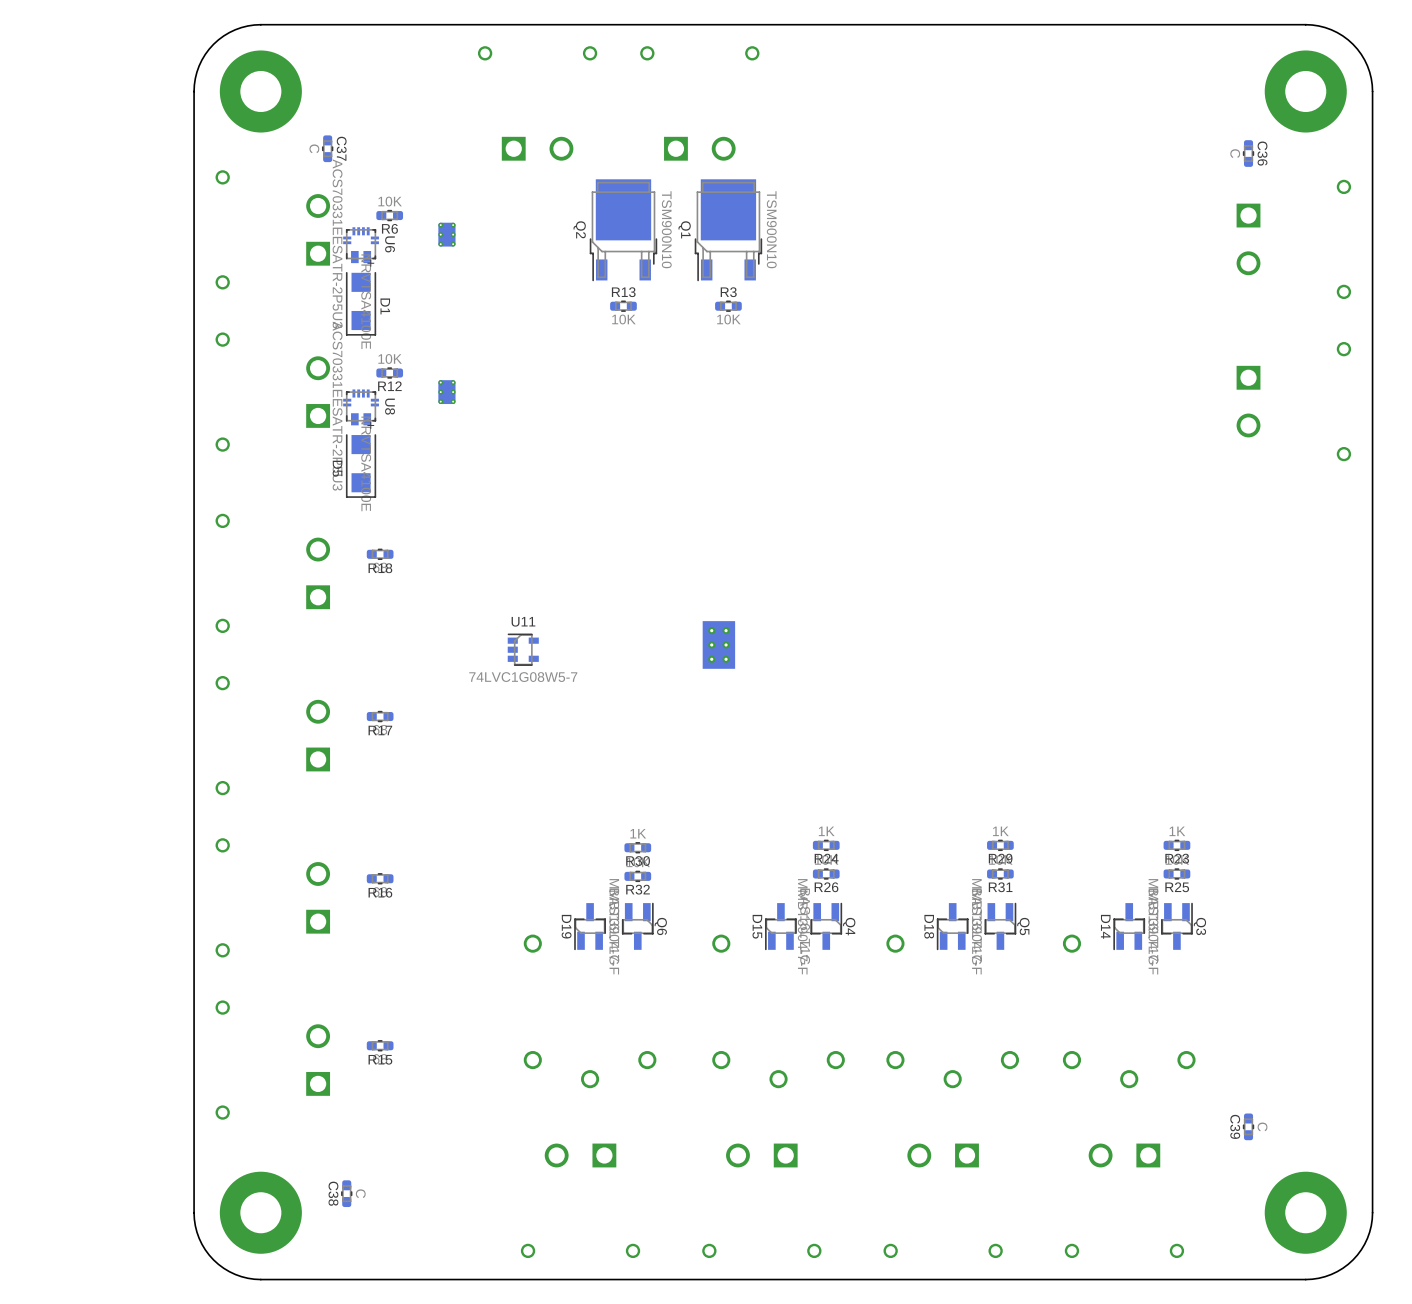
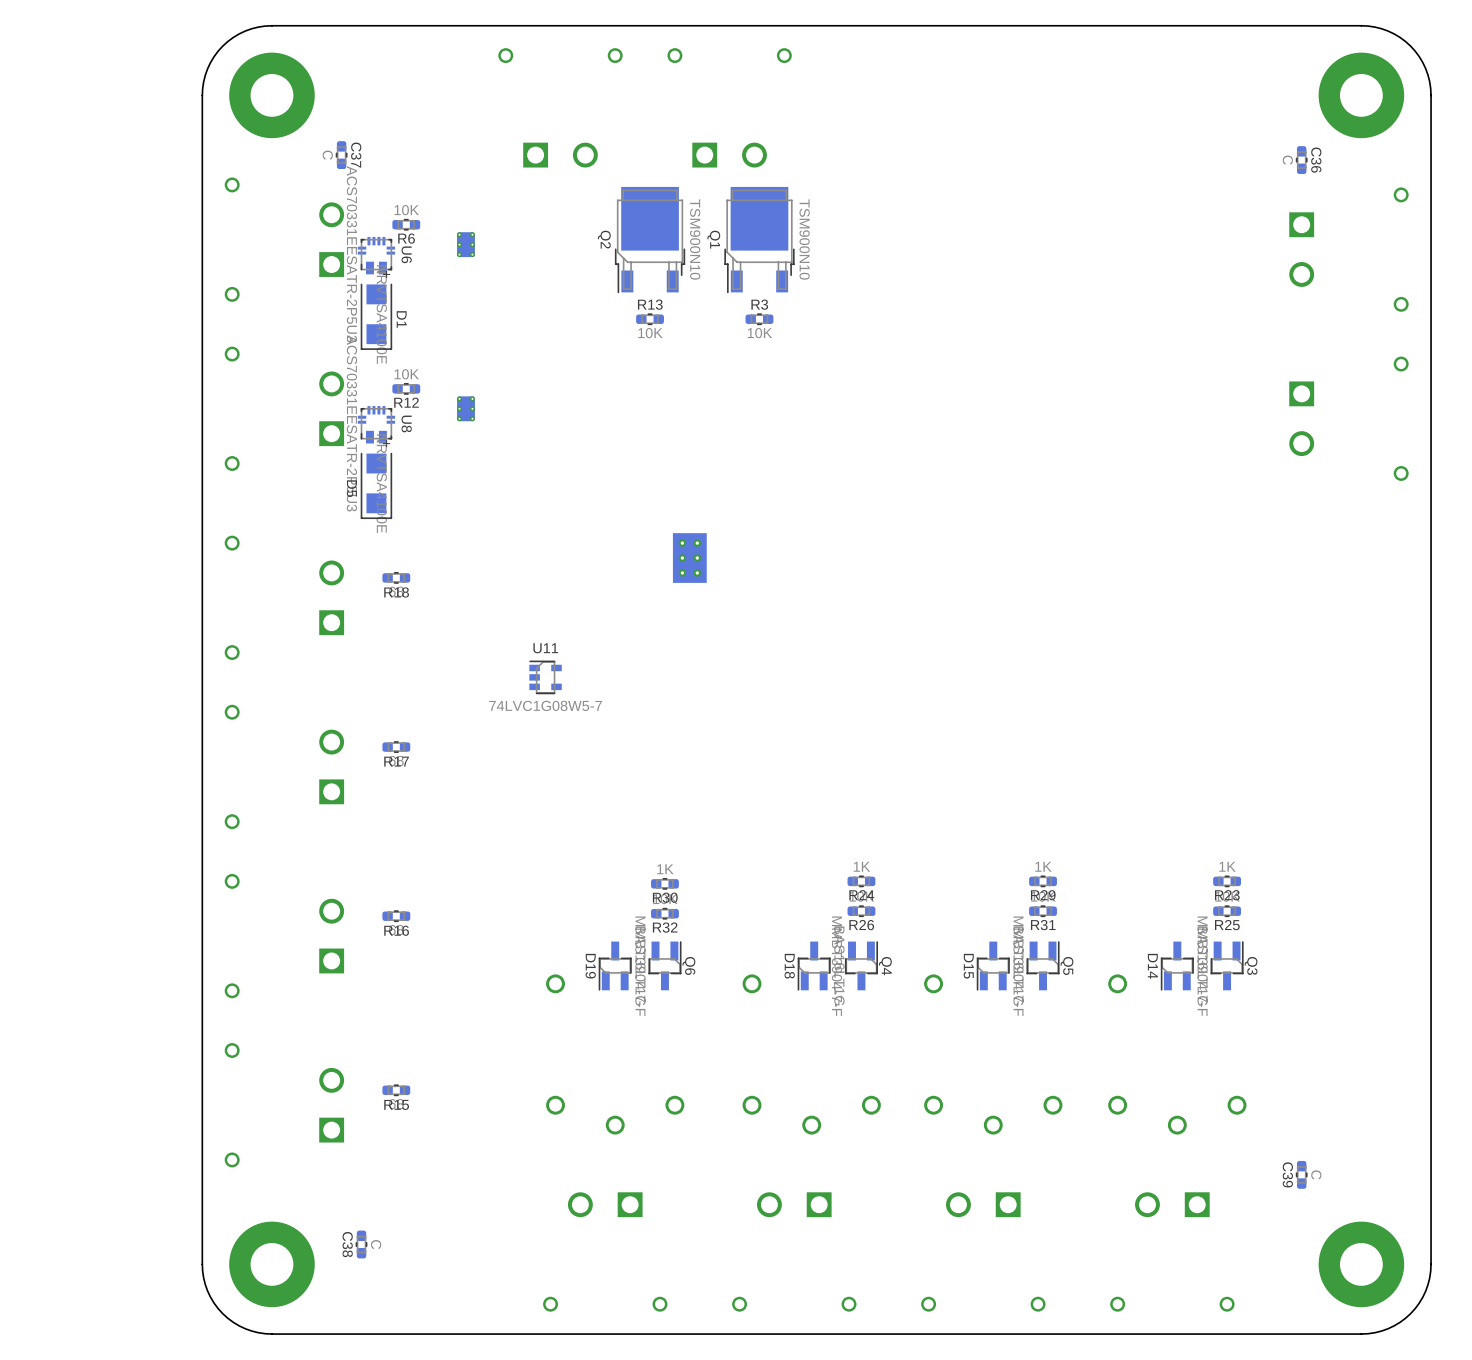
part position: (718, 644) -> (689, 558)
D15 name: D15 (757, 926) -> D18 (789, 966)
D18 name: D18 (929, 926) -> D15 (968, 966)

